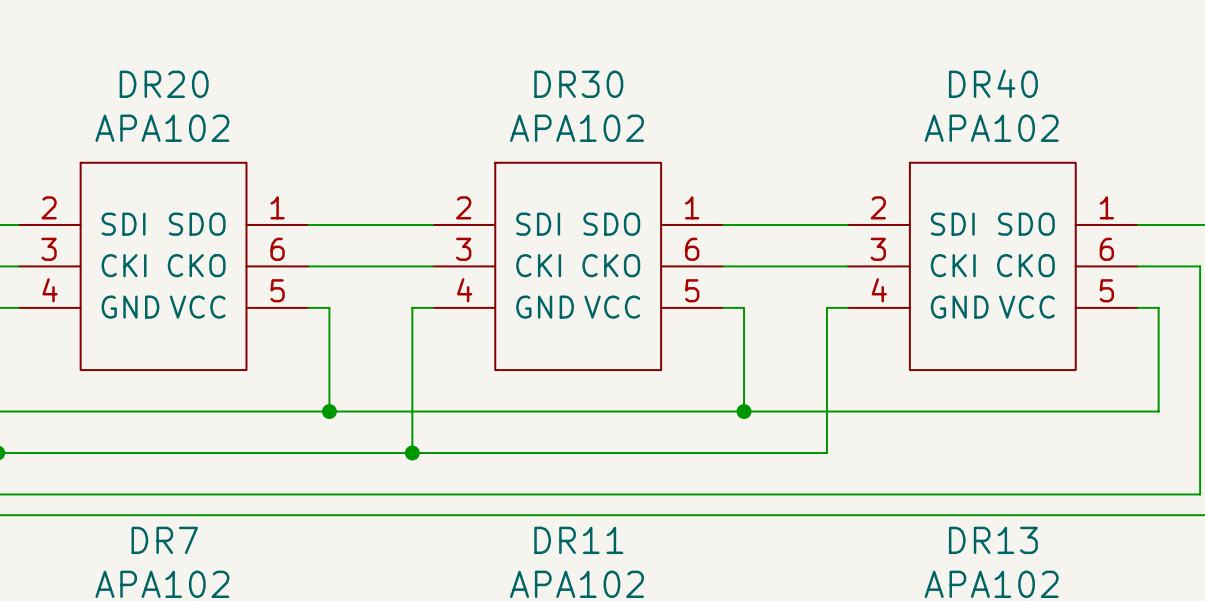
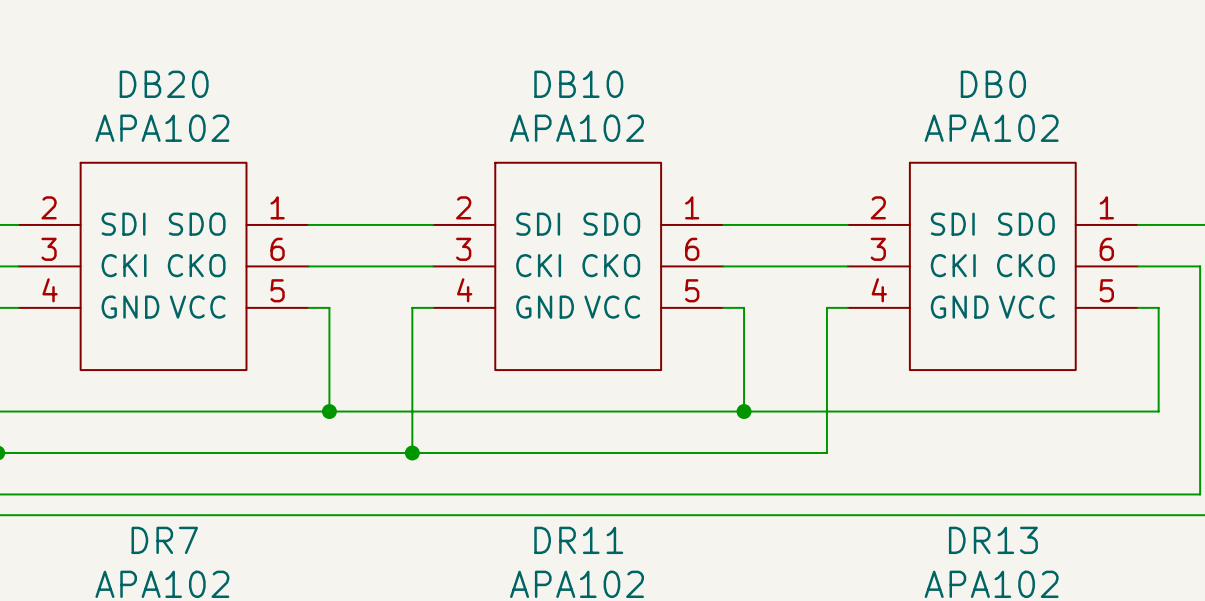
DR40 name: DR40 (993, 83) -> DB0 (993, 84)
DR20 name: DR20 (164, 84) -> DB20 (164, 84)
DR30 name: DR30 (578, 84) -> DB10 (578, 84)

